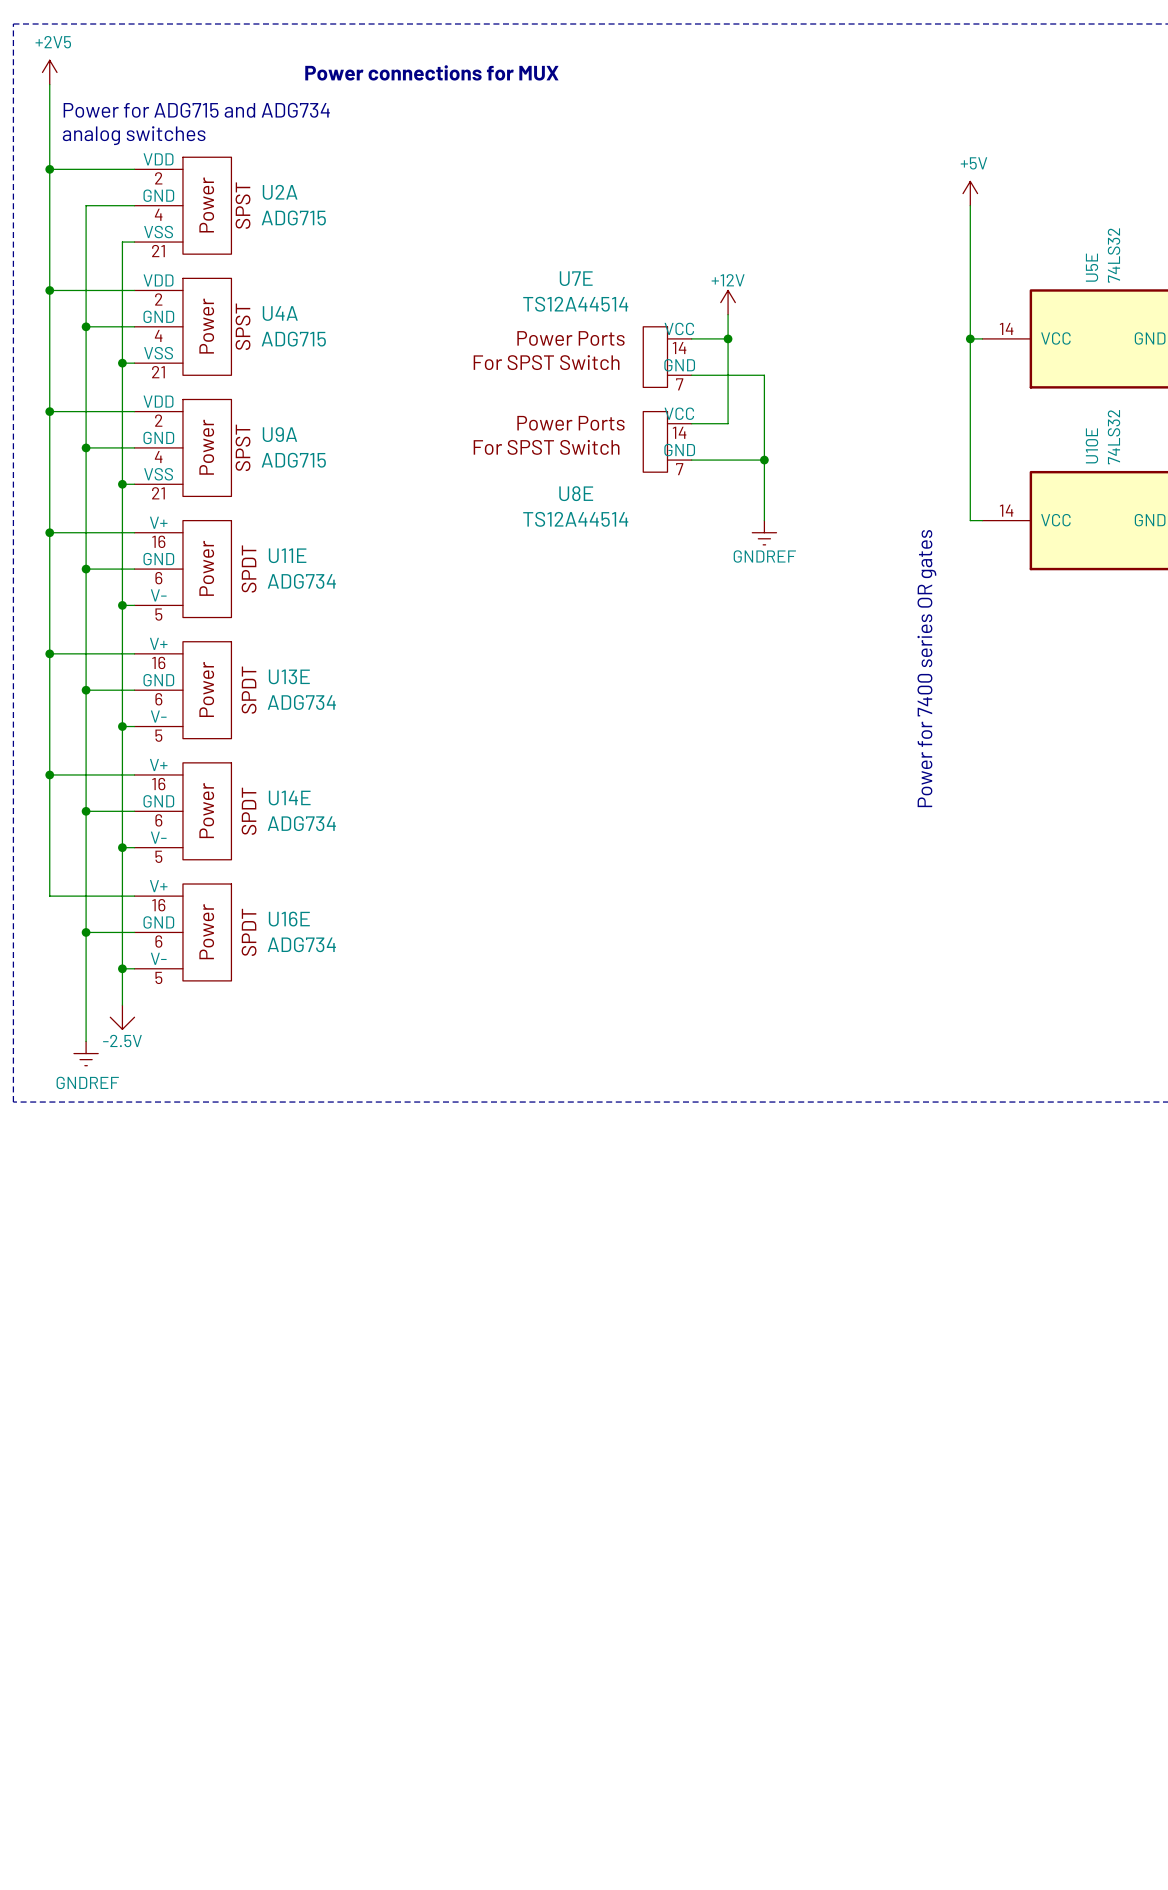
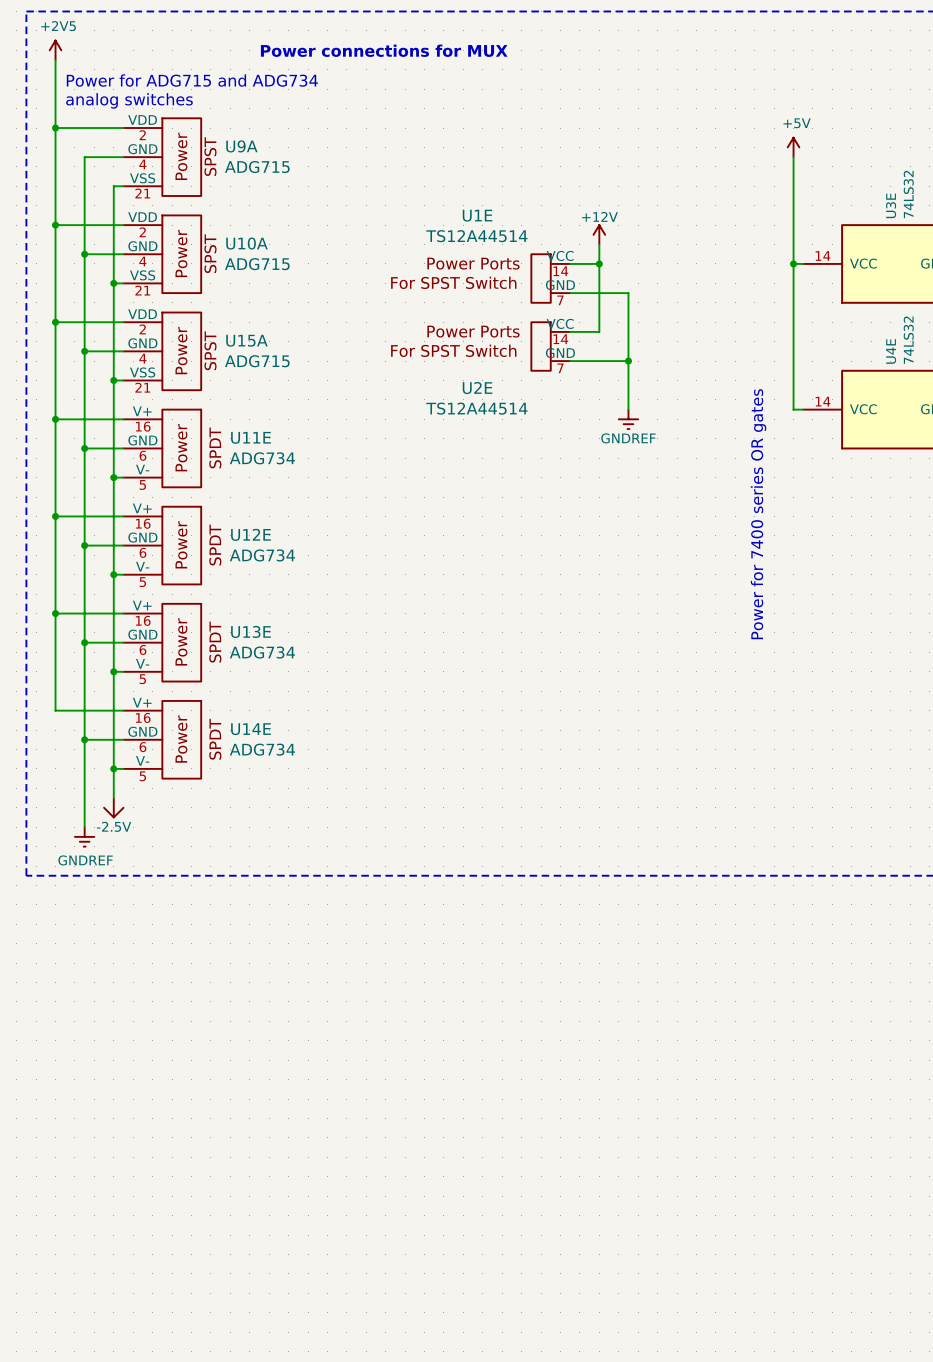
U2A name: U2A (280, 192) -> U9A (241, 146)
U5E name: U5E (1092, 267) -> U3E (891, 205)
U7E name: U7E (576, 278) -> U1E (477, 215)
U4A name: U4A (280, 313) -> U10A (246, 243)
U9A name: U9A (279, 434) -> U15A (246, 340)
U10E name: U10E (1091, 445) -> U4E (891, 351)
U8E name: U8E (576, 493) -> U2E (477, 388)
U13E name: U13E (289, 676) -> U12E (250, 534)
U14E name: U14E (289, 798) -> U13E (250, 631)
U16E name: U16E (289, 919) -> U14E (250, 729)

